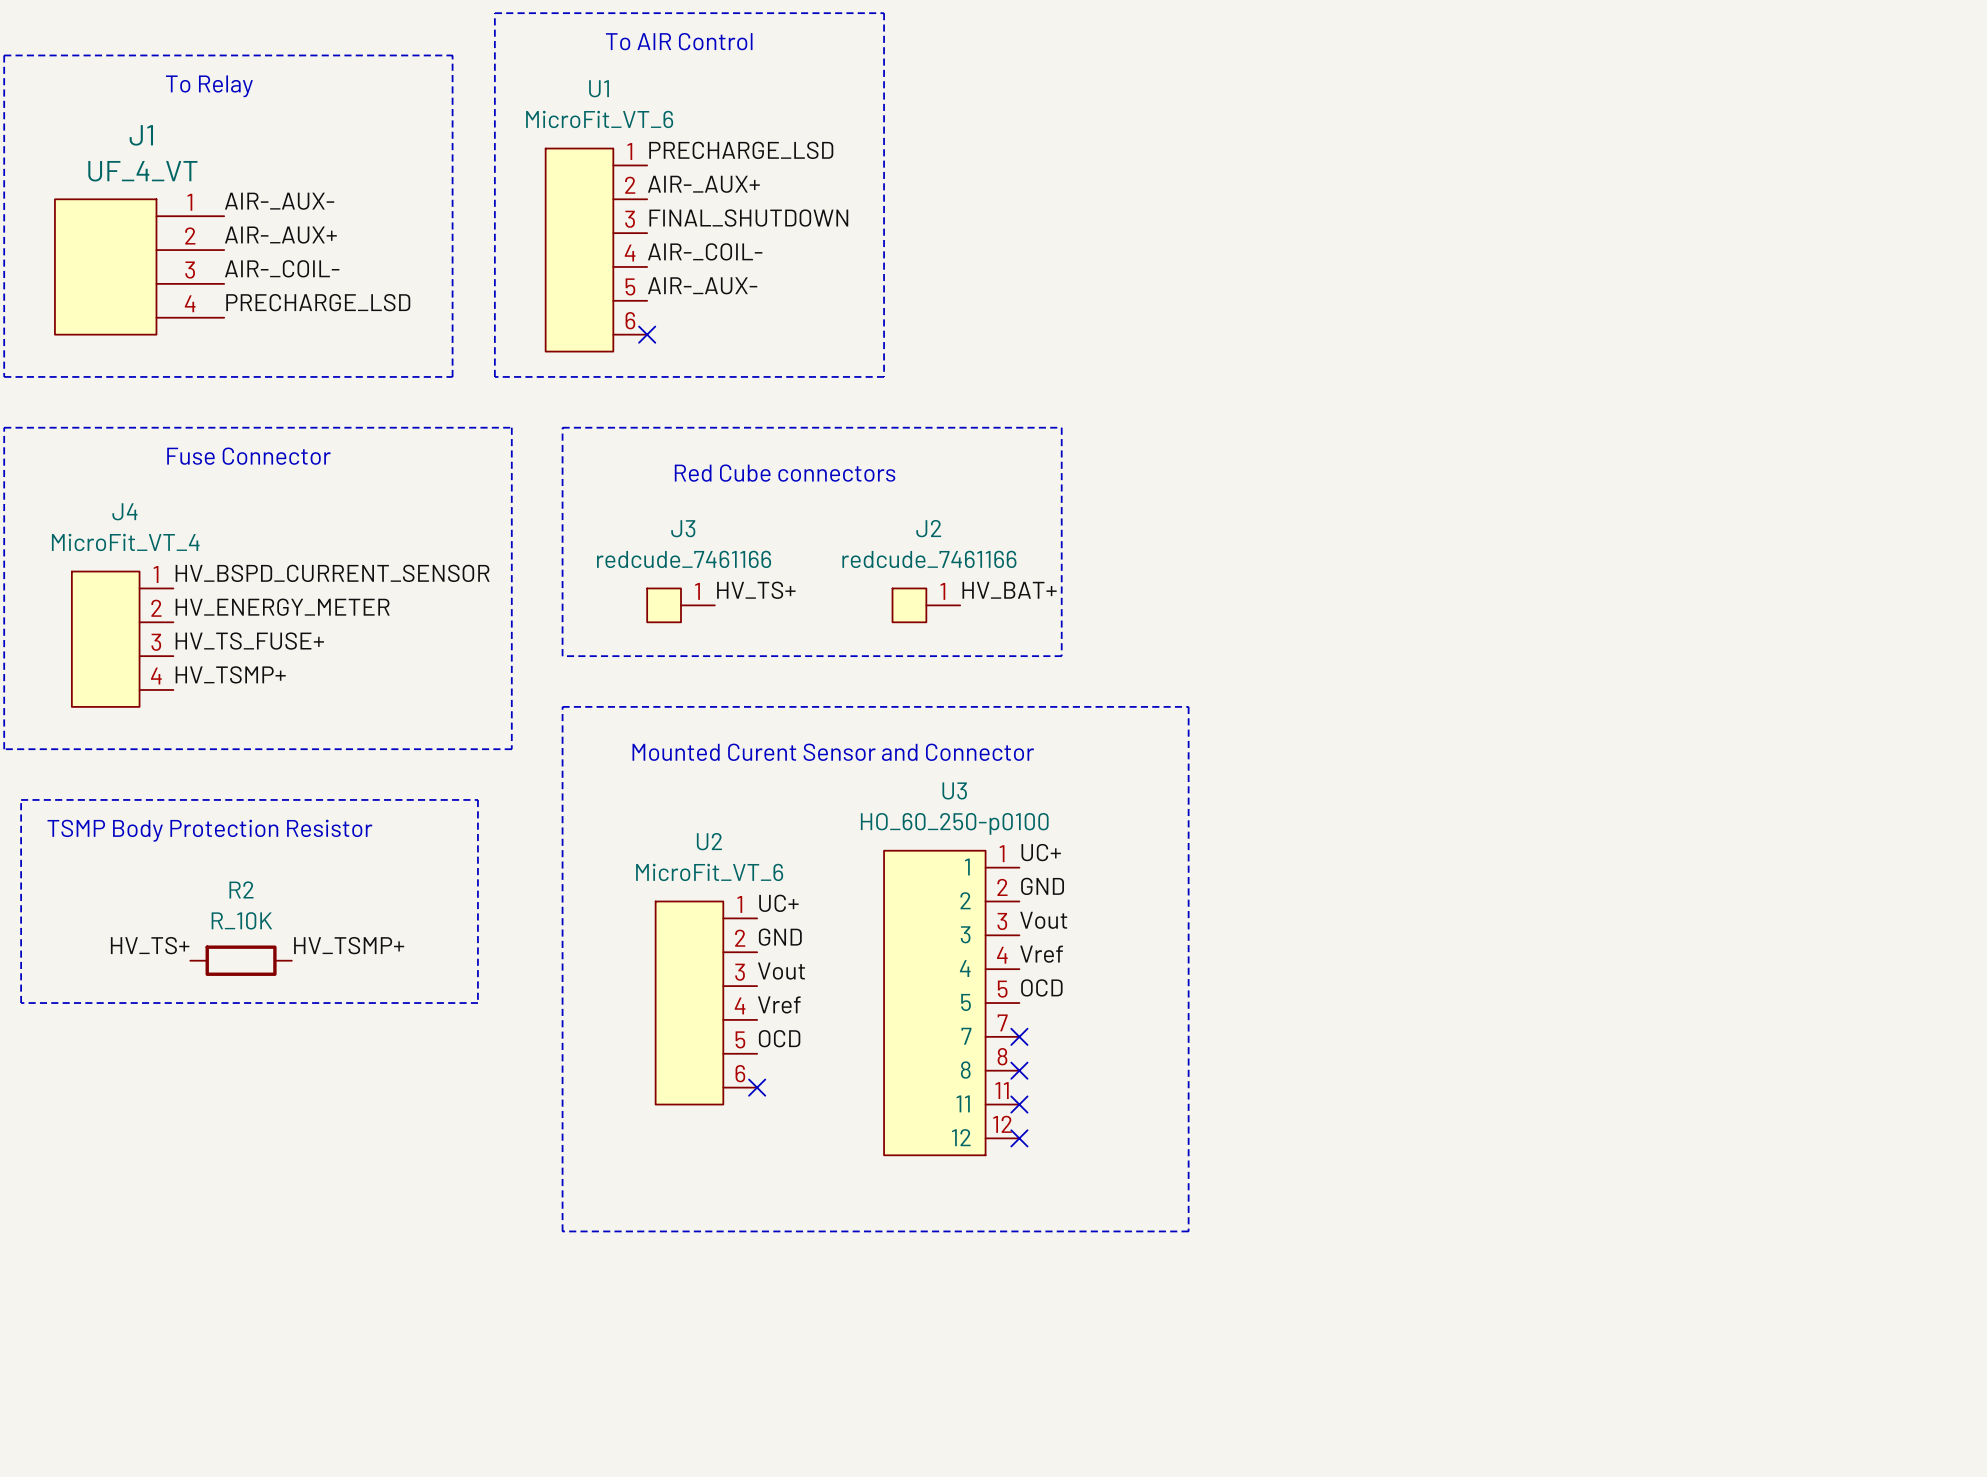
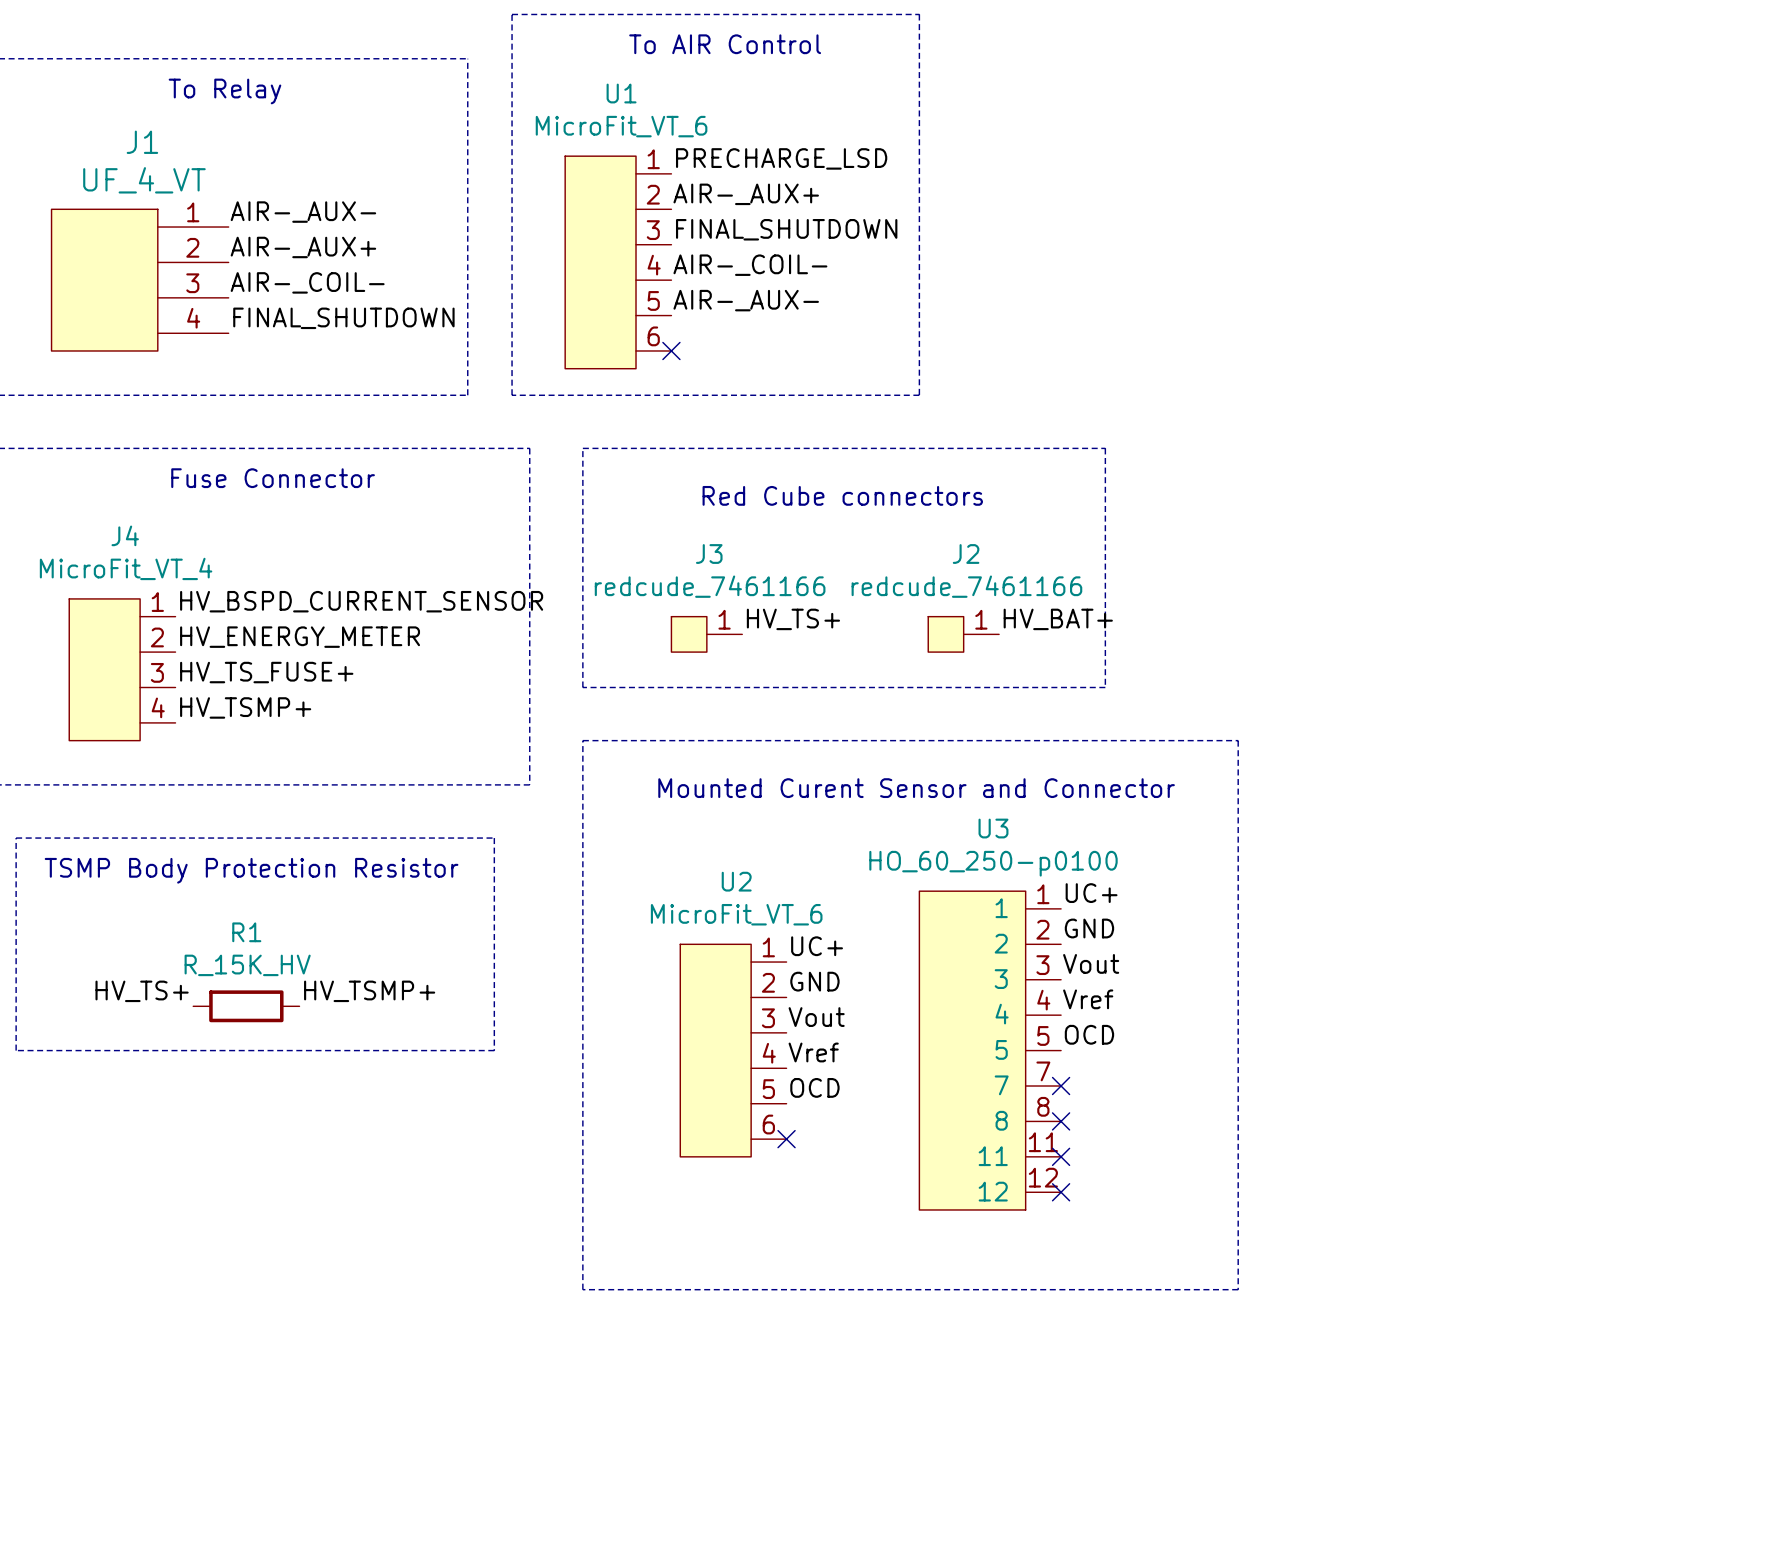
label: PRECHARGE_LSD (318, 302) -> FINAL_SHUTDOWN (343, 318)
R2 name: R2 (241, 889) -> R1 (246, 932)
R2 value: R_10K (241, 920) -> R_15K_HV (247, 965)

